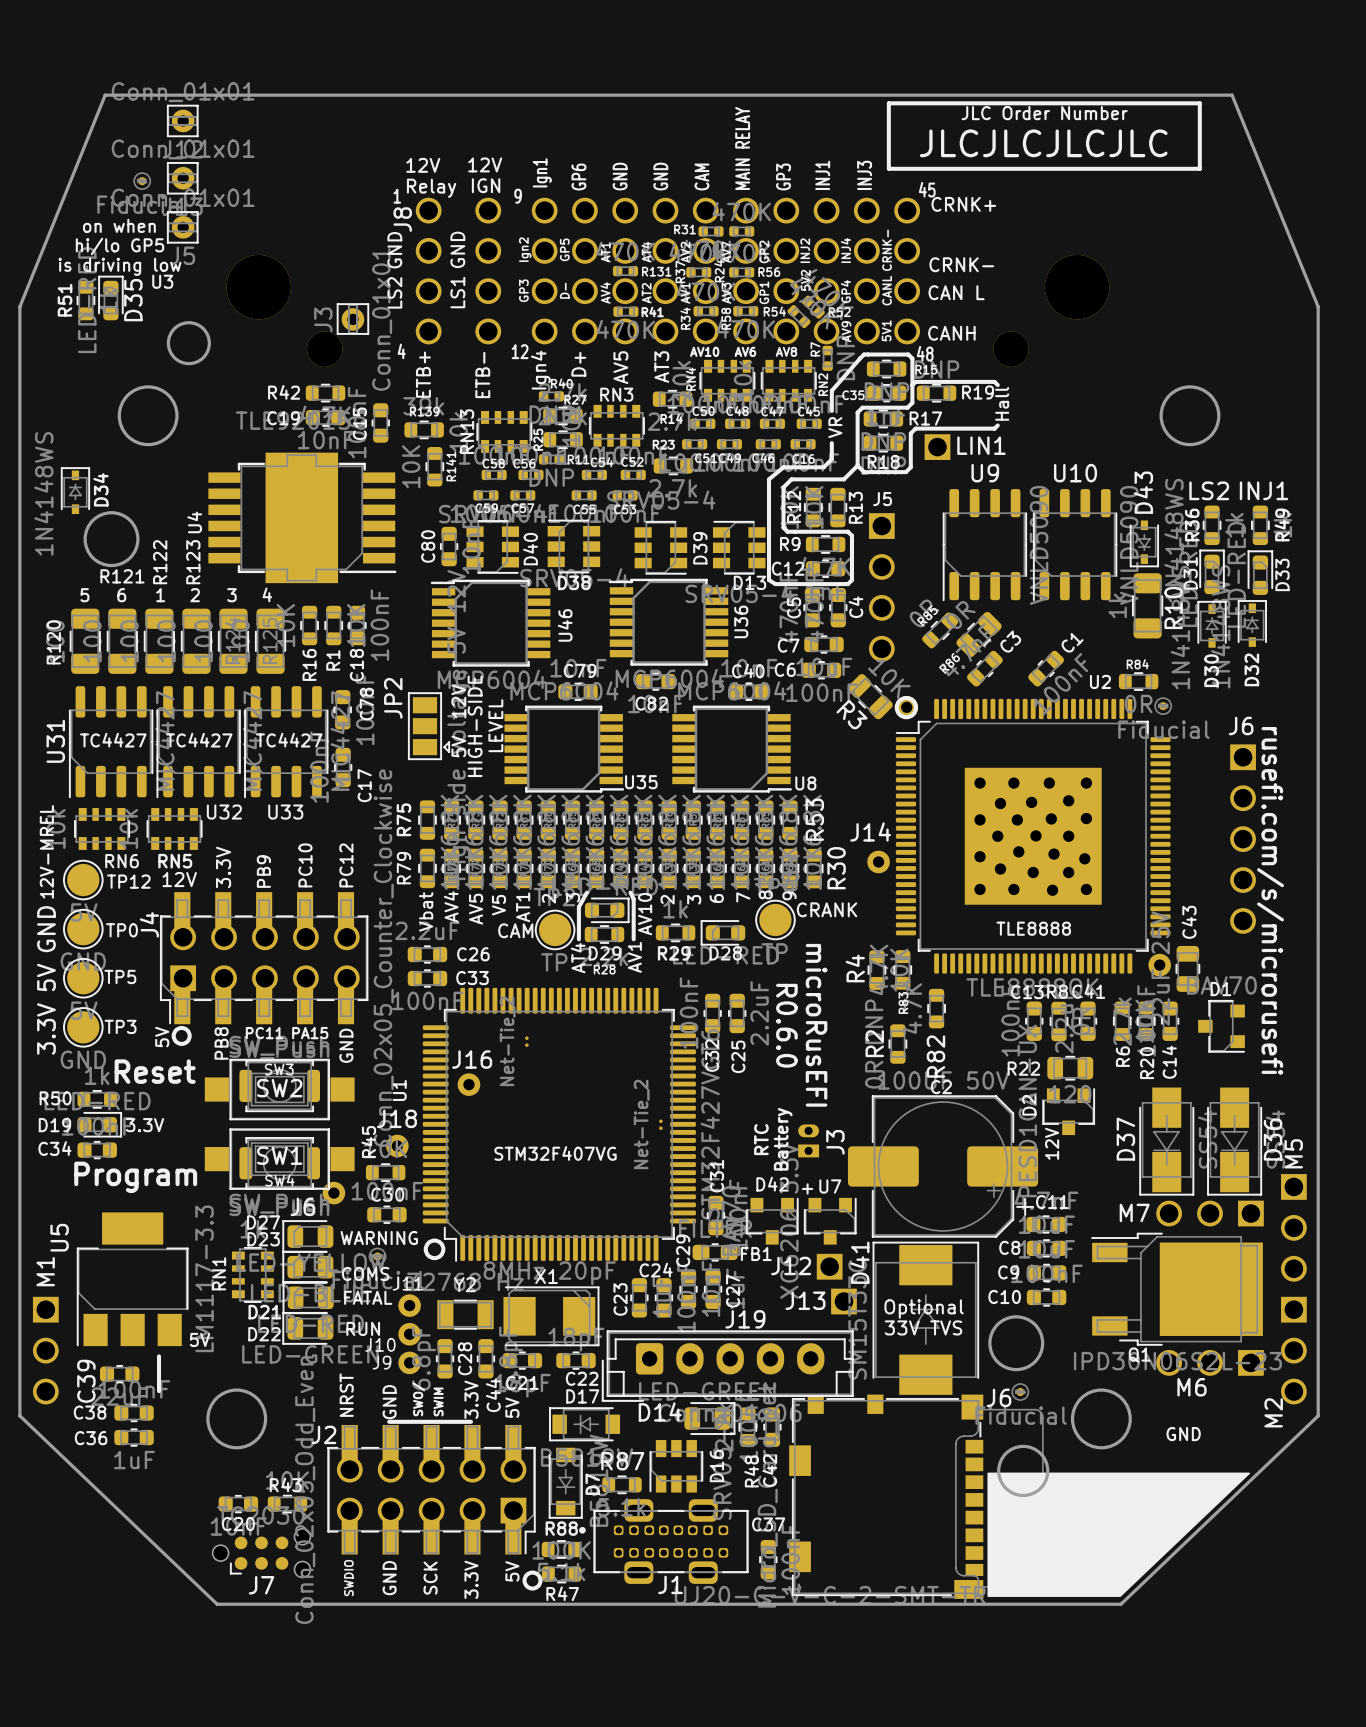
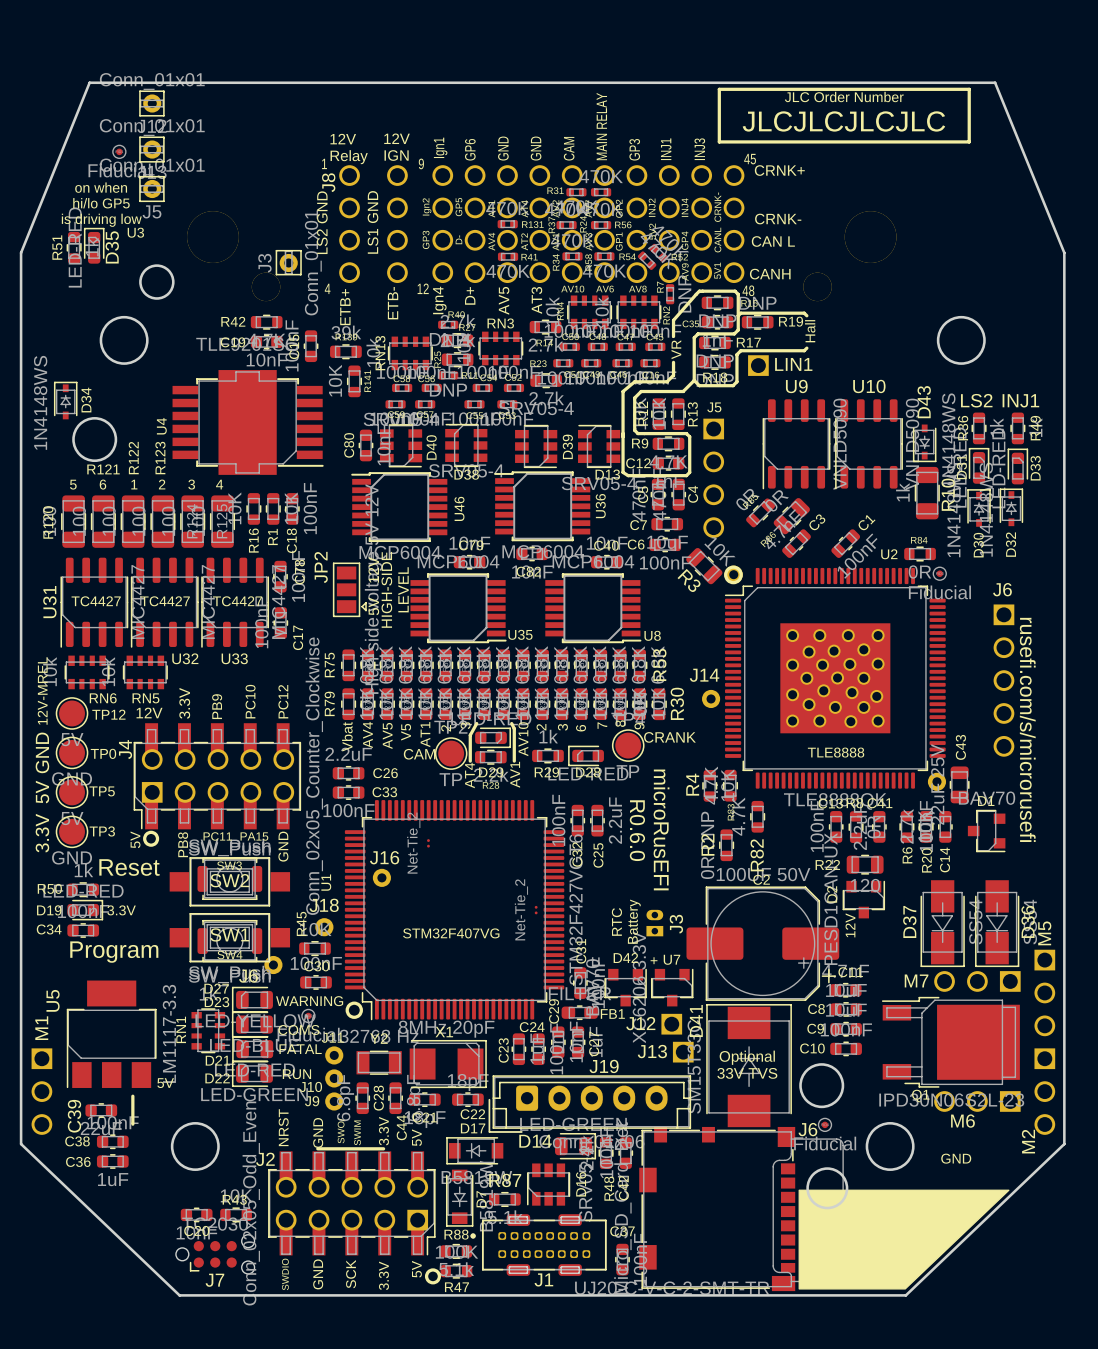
J1 footprint: [579, 1499, 749, 1584] -> [470, 1214, 607, 1276]

